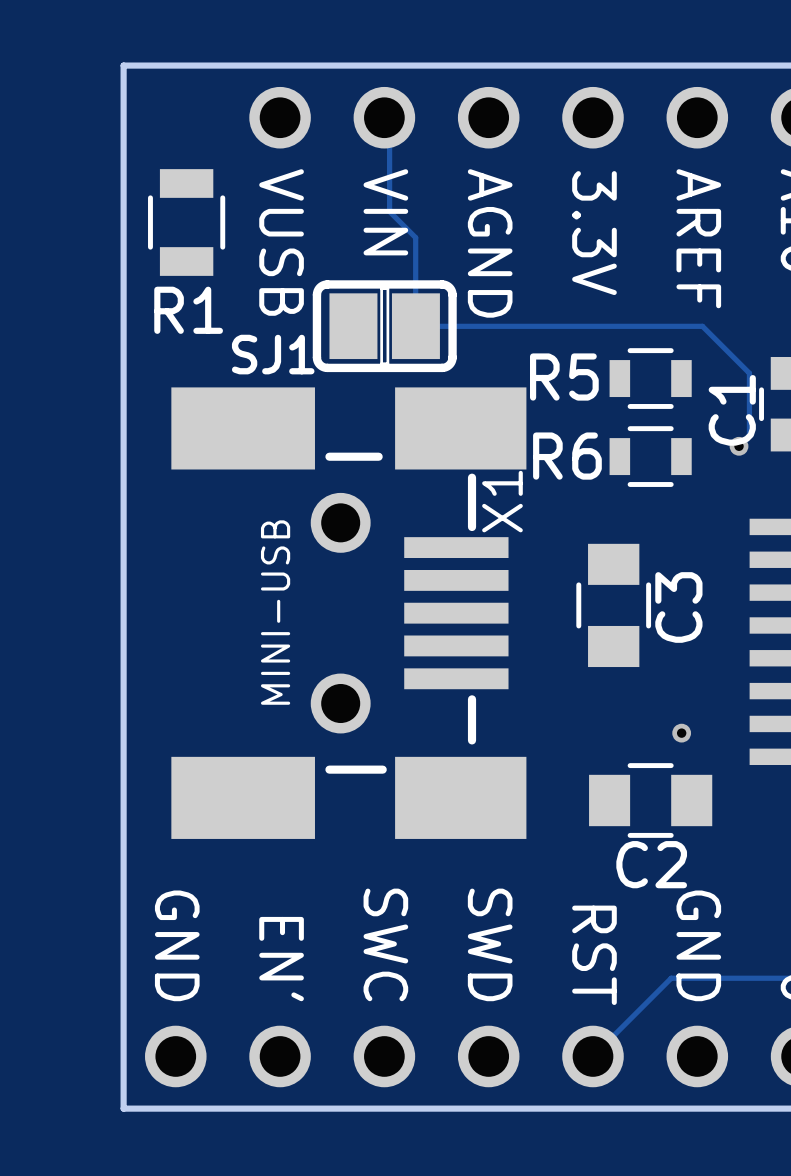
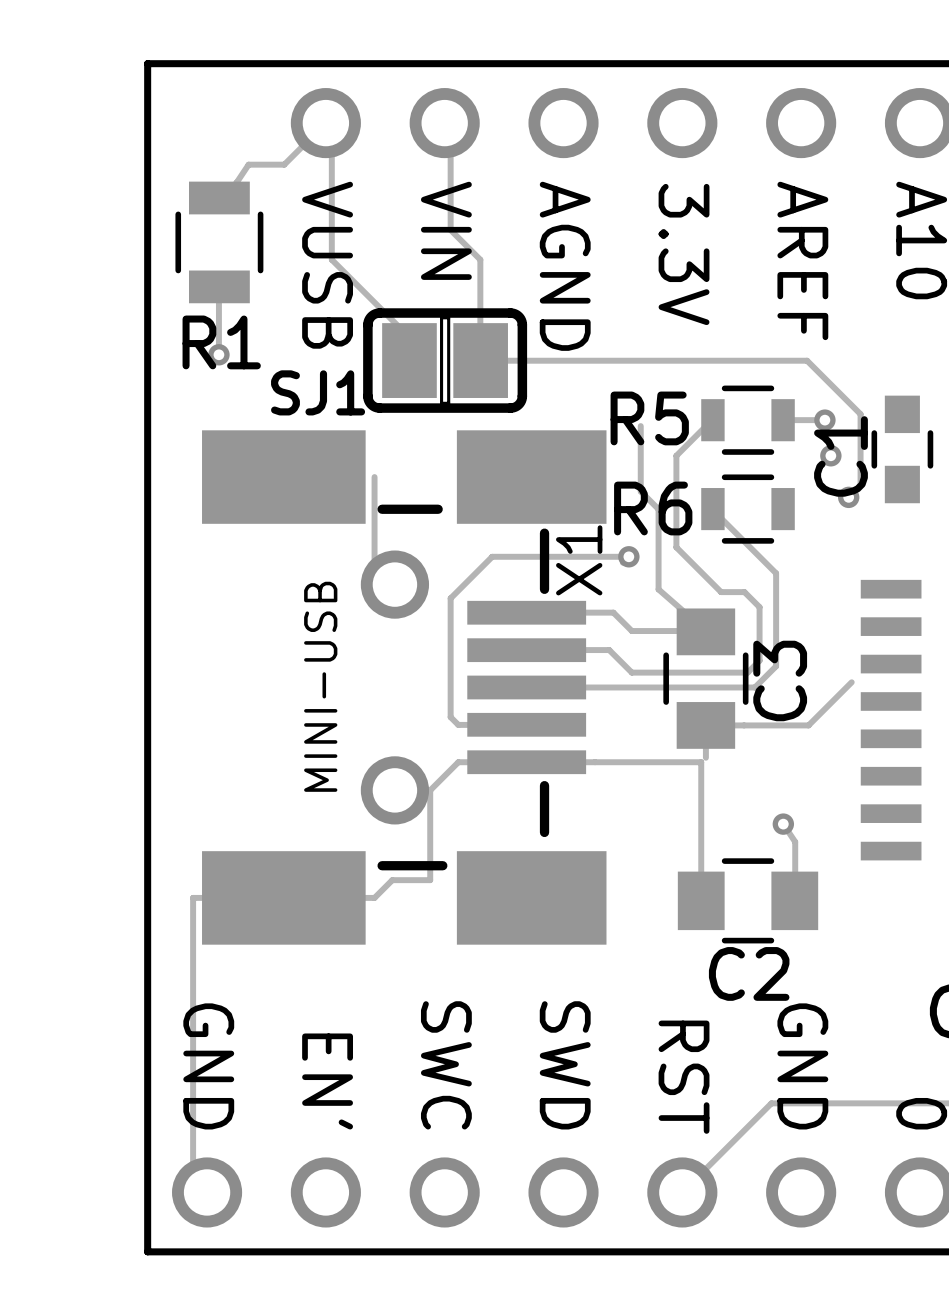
track: none -> (218, 200) (236, 182) (248, 164) (284, 164) (325, 123) (331, 129) (331, 259) (409, 336) (409, 360)
track: none -> (218, 283) (218, 354)
via: none -> (218, 354)
track: none -> (712, 420) (676, 455) (676, 547) (721, 592) (744, 592) (759, 607) (759, 660) (747, 672) (631, 672) (609, 650) (526, 650)
track: none -> (783, 420) (824, 420)
via: none -> (824, 420)
track: none -> (640, 426) (640, 491) (658, 509) (658, 589) (706, 631) (631, 631) (613, 612) (526, 612)
via: none -> (830, 455)
track: none -> (374, 477) (374, 564) (394, 584)
track: none -> (712, 509) (776, 573) (776, 666) (754, 687) (526, 687)
via: none -> (628, 556)
track: none -> (622, 562) (628, 556) (492, 556) (450, 598) (450, 717) (458, 724) (526, 724)
track: none -> (851, 682) (808, 725) (705, 725) (705, 757)
track: none -> (430, 790) (458, 762) (701, 762) (701, 900)
track: none -> (430, 790) (430, 880) (392, 880) (374, 897) (193, 897) (193, 1178) (207, 1192)
track: none -> (783, 824) (795, 841) (795, 901)

